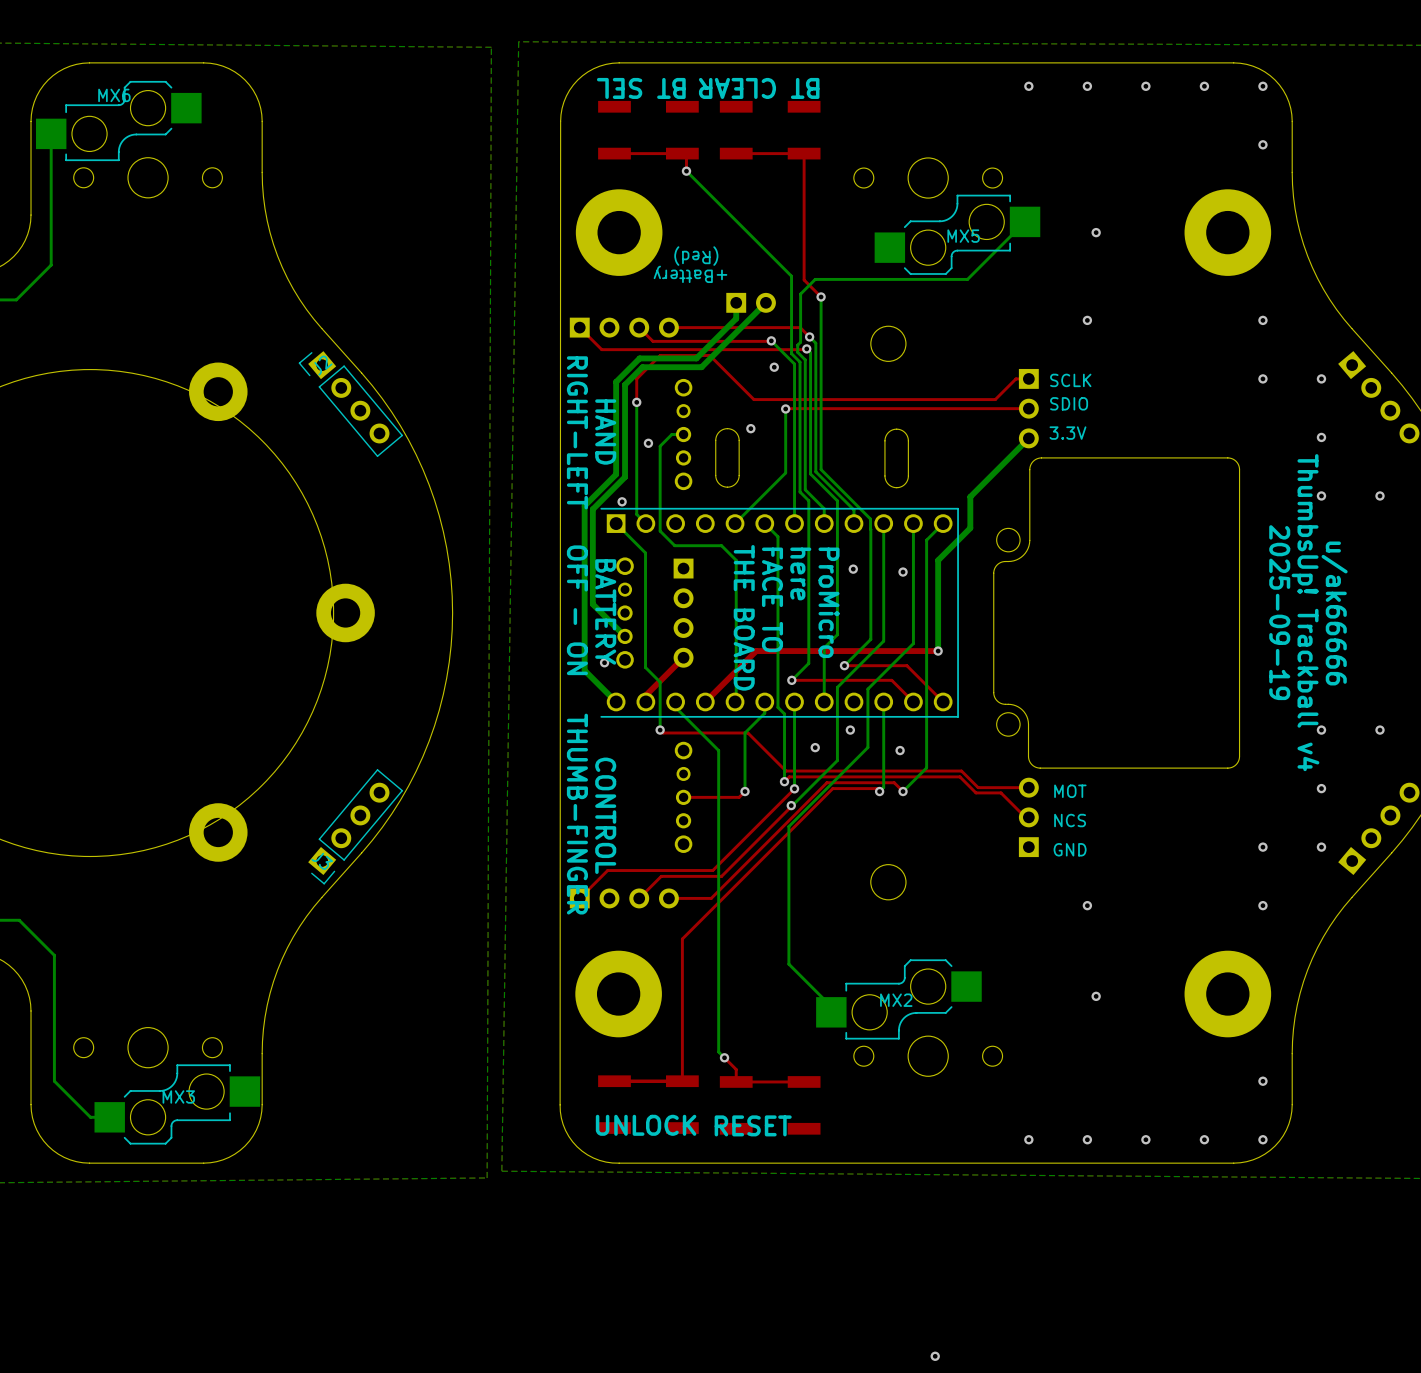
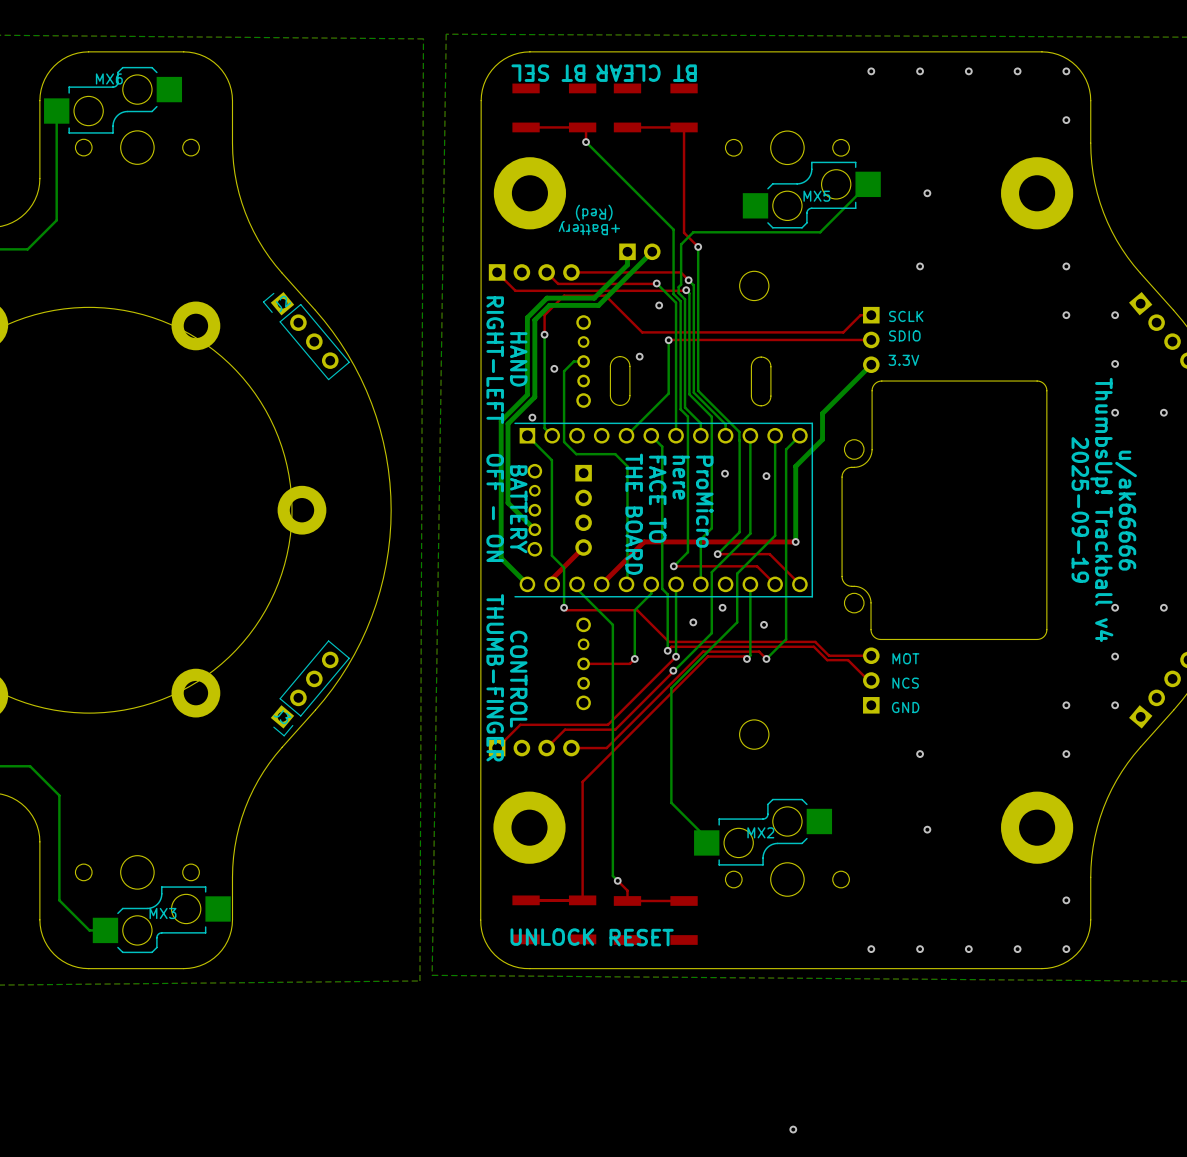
via: (604, 662) -> none

